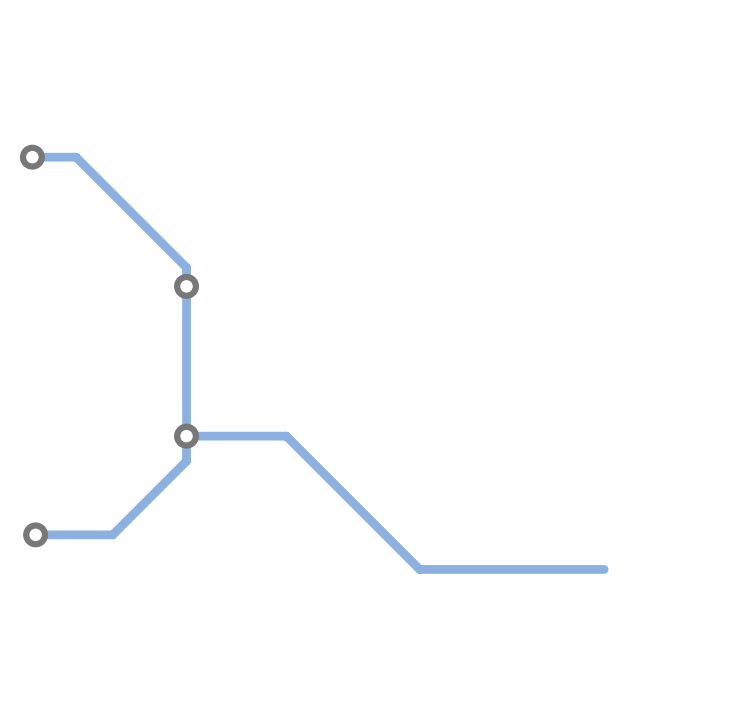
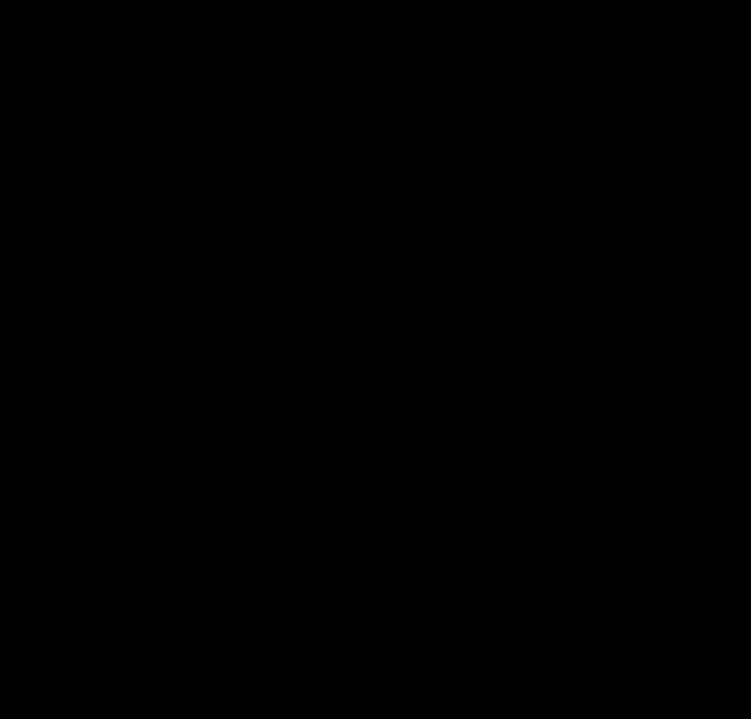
track: (32, 157) (76, 157) (186, 267) (186, 461) (112, 534) (35, 534) -> none
via: (32, 157) -> none
via: (186, 286) -> none
track: (186, 436) (286, 436) (419, 569) (604, 569) -> none
via: (186, 436) -> none
via: (35, 534) -> none

